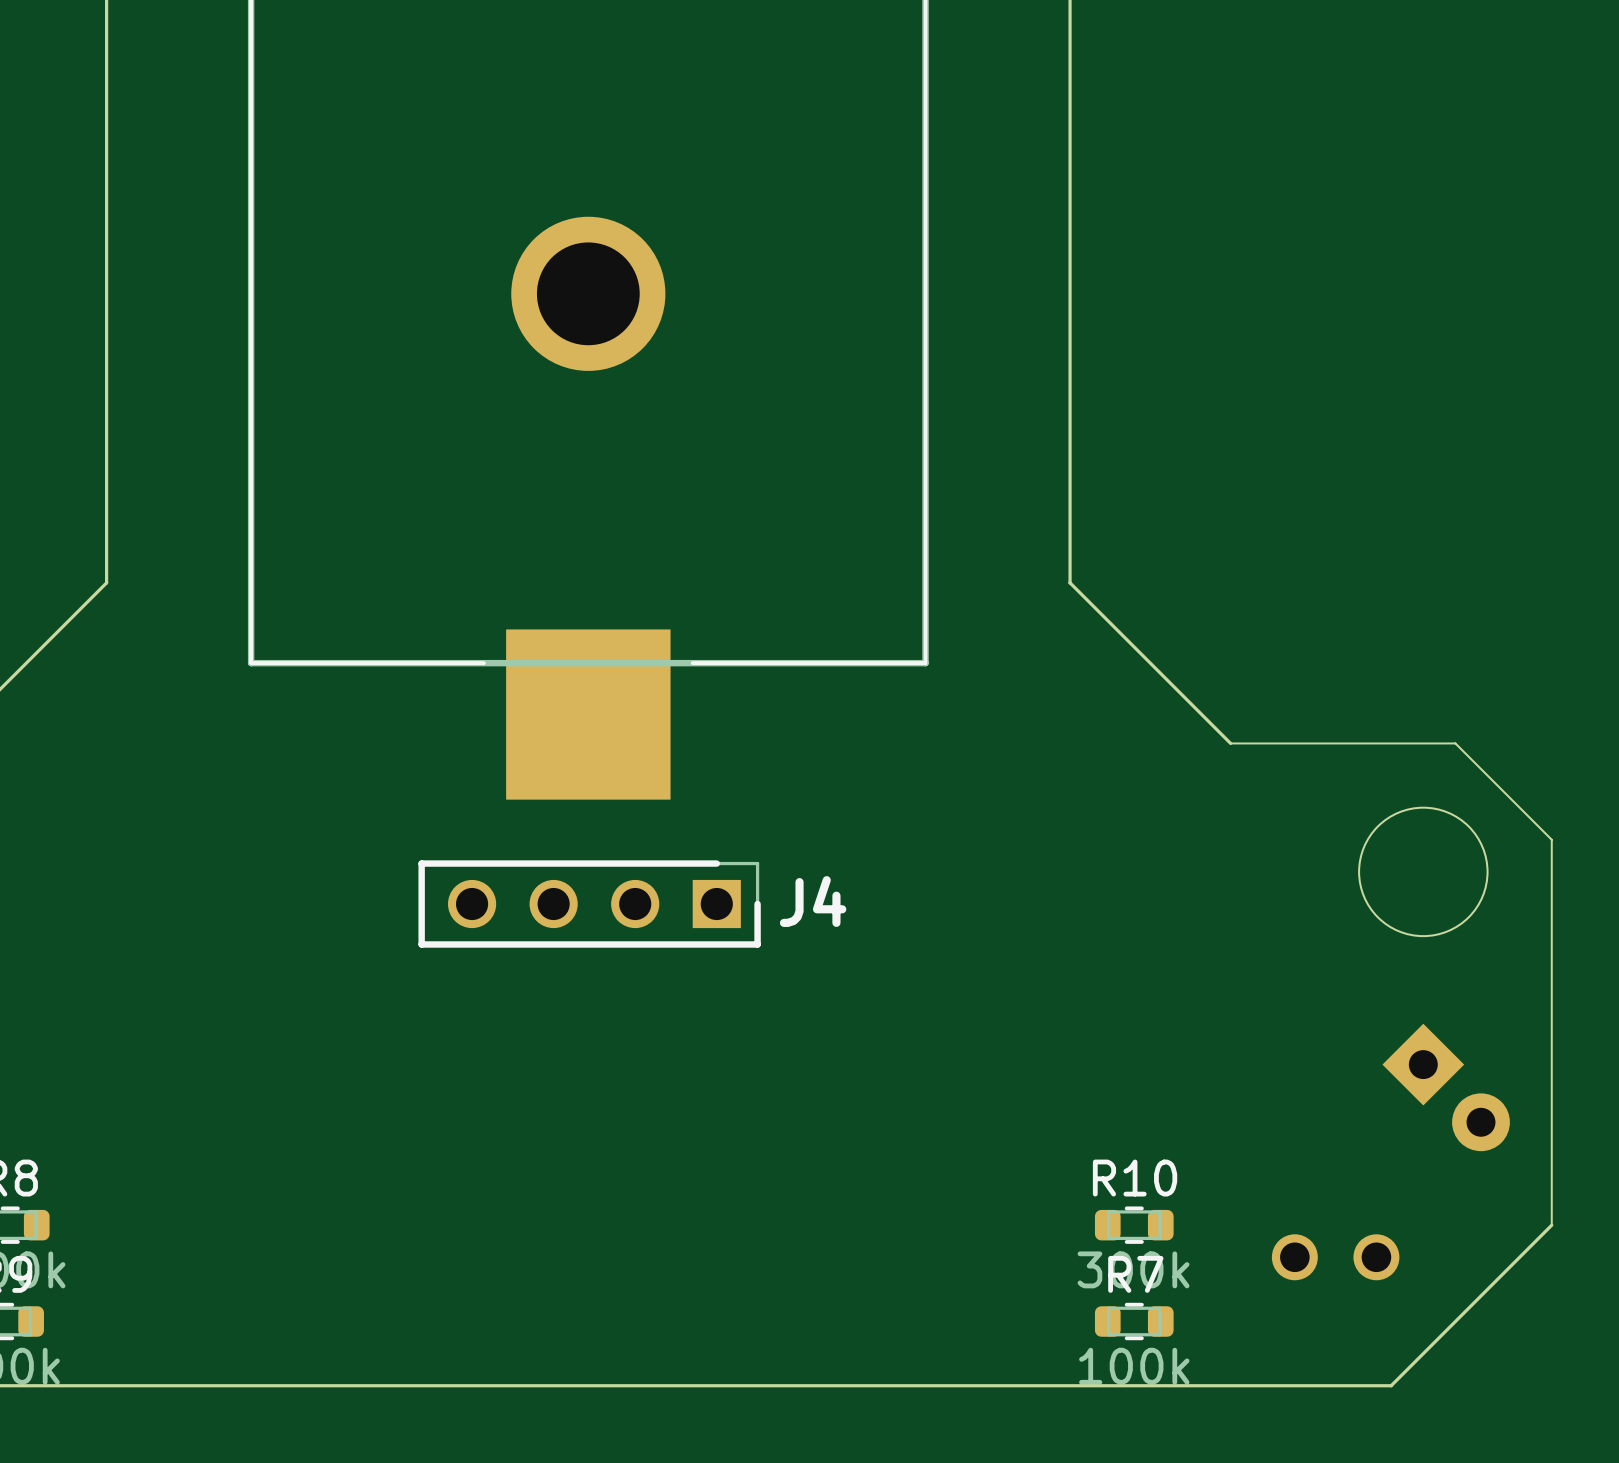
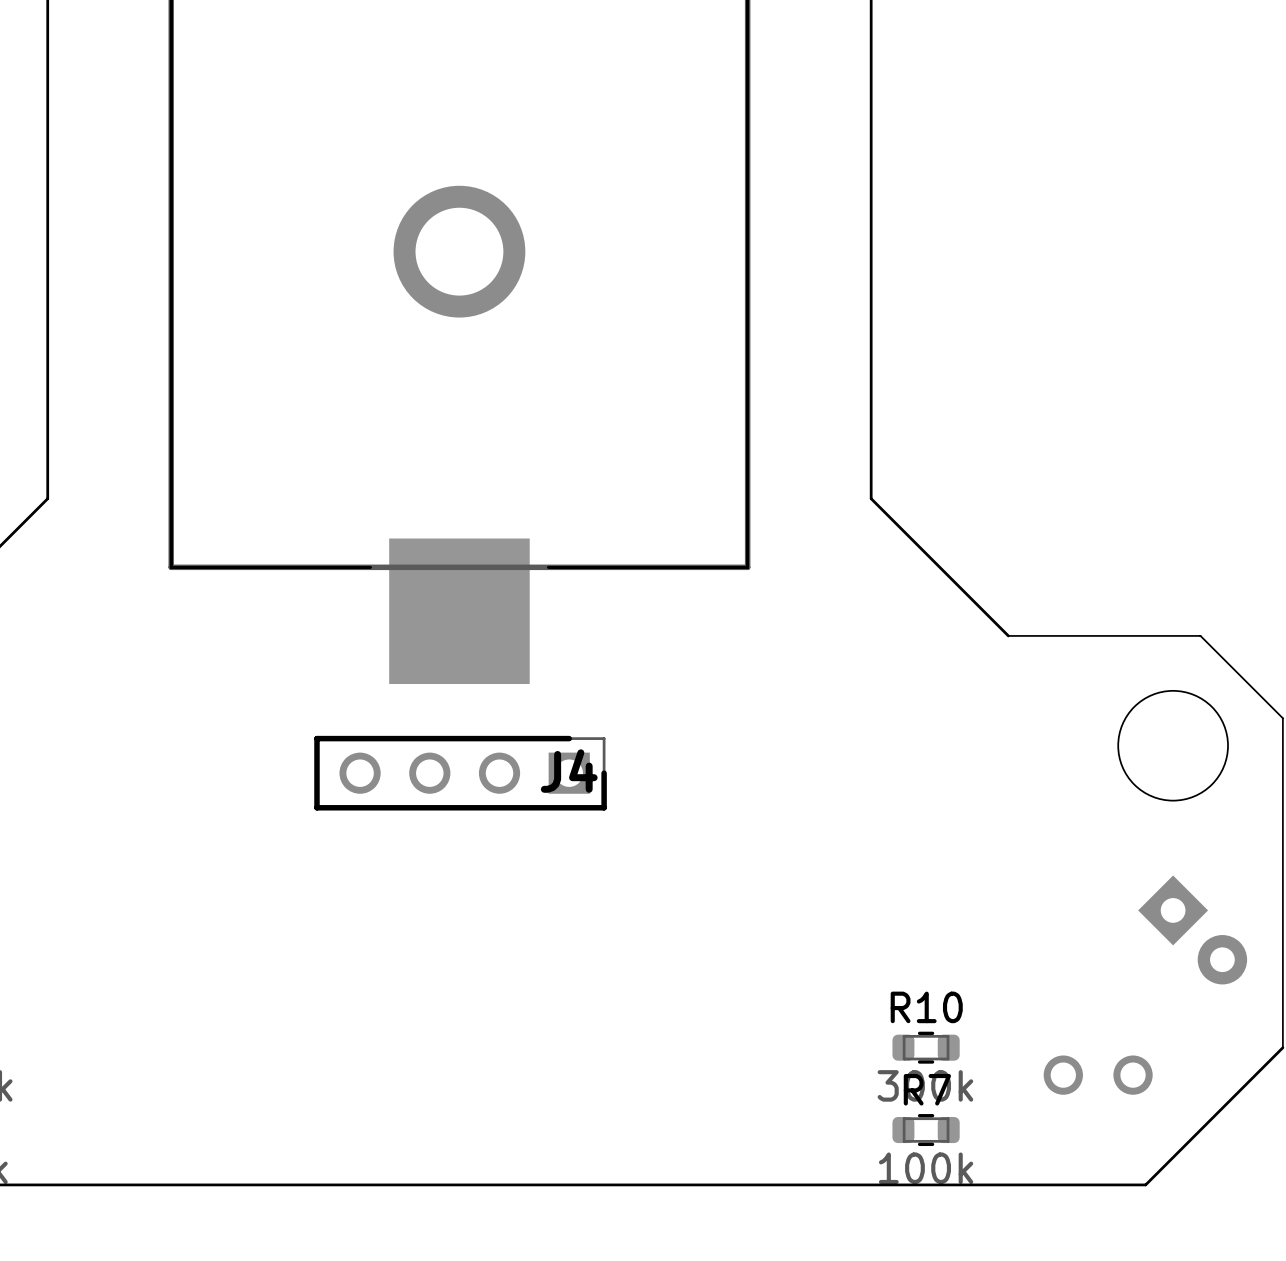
J4 name position: J4 (813, 901) -> J4 (569, 771)

